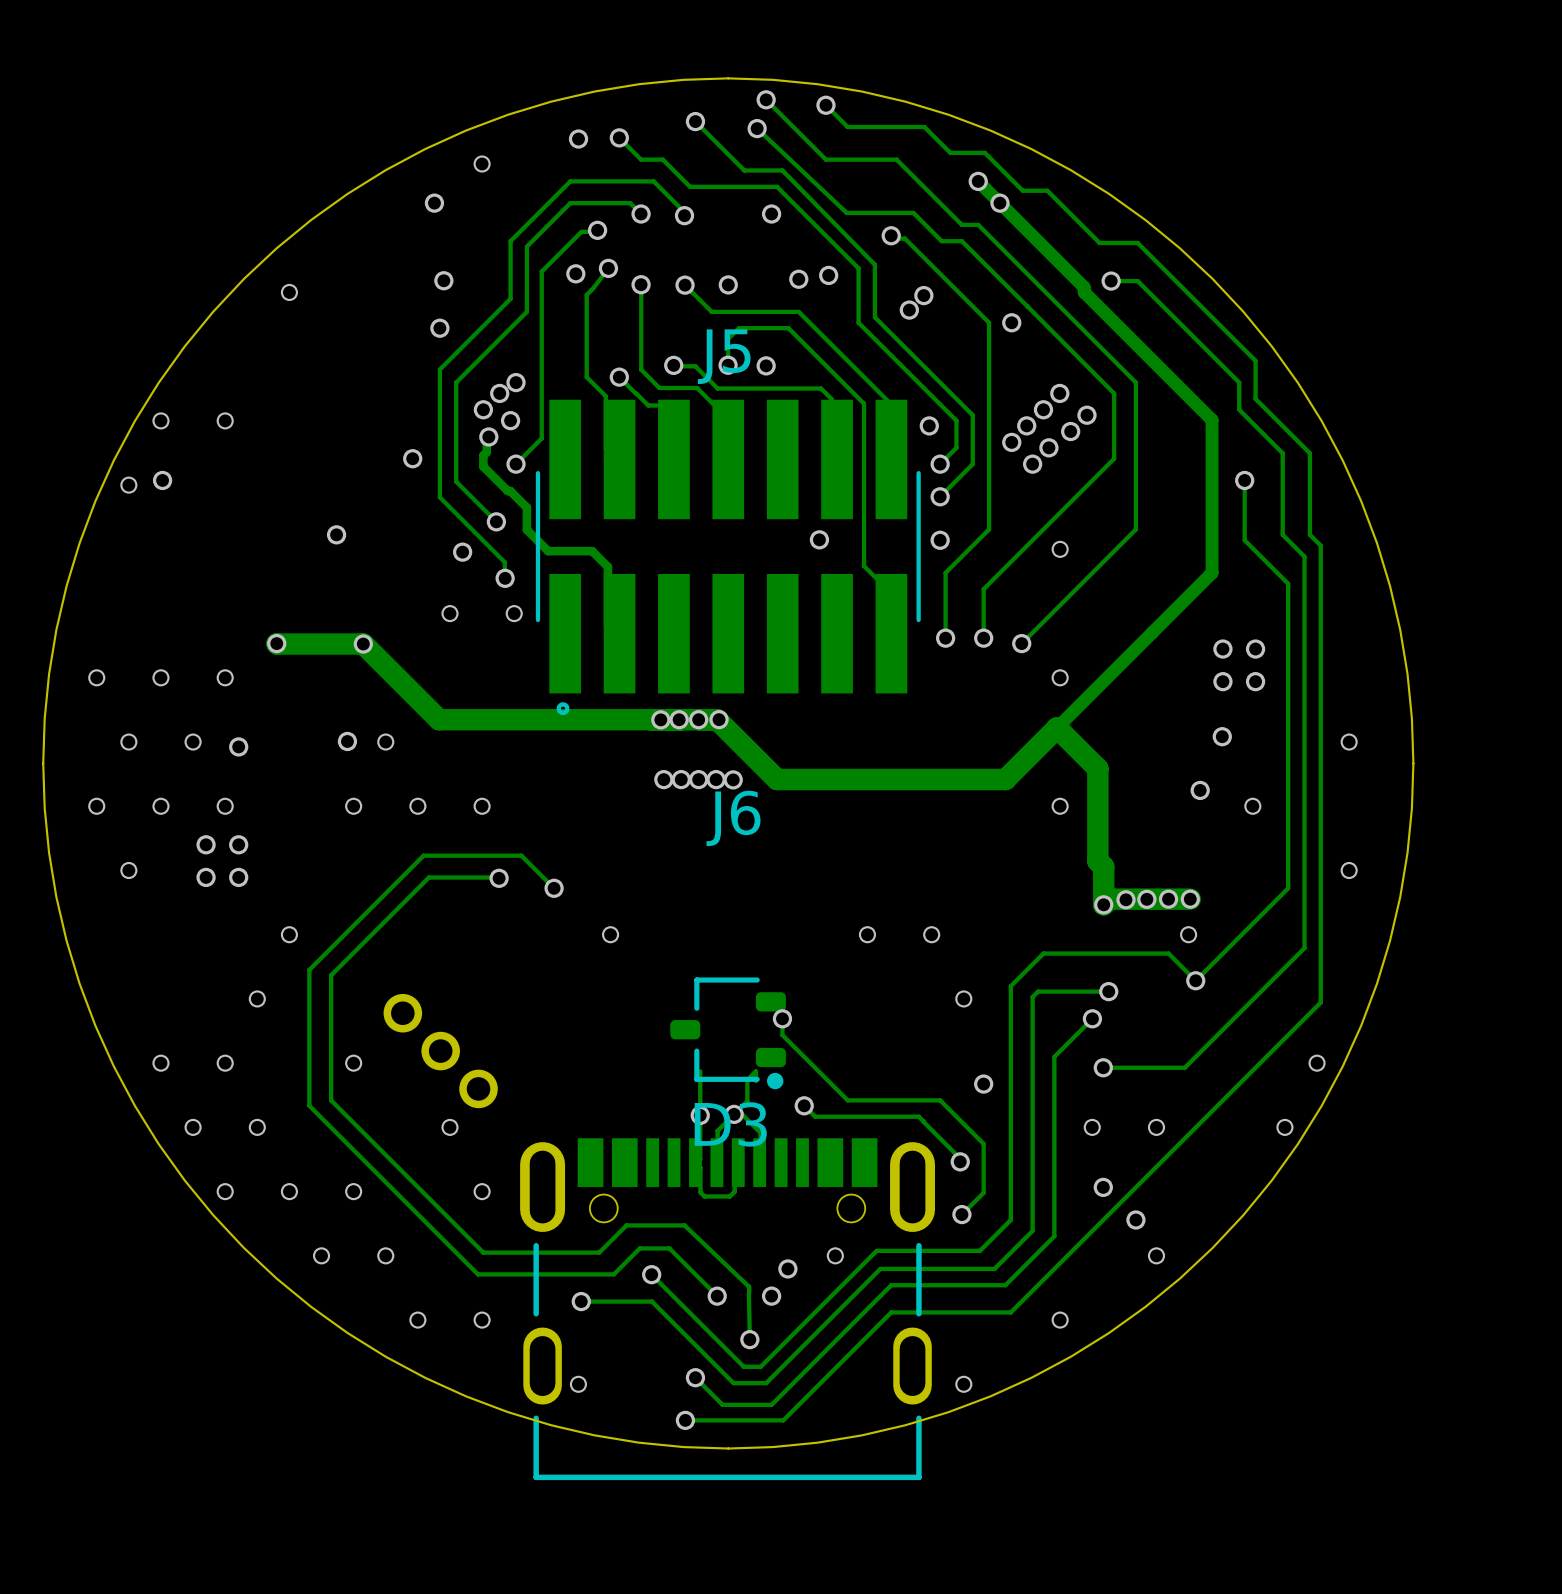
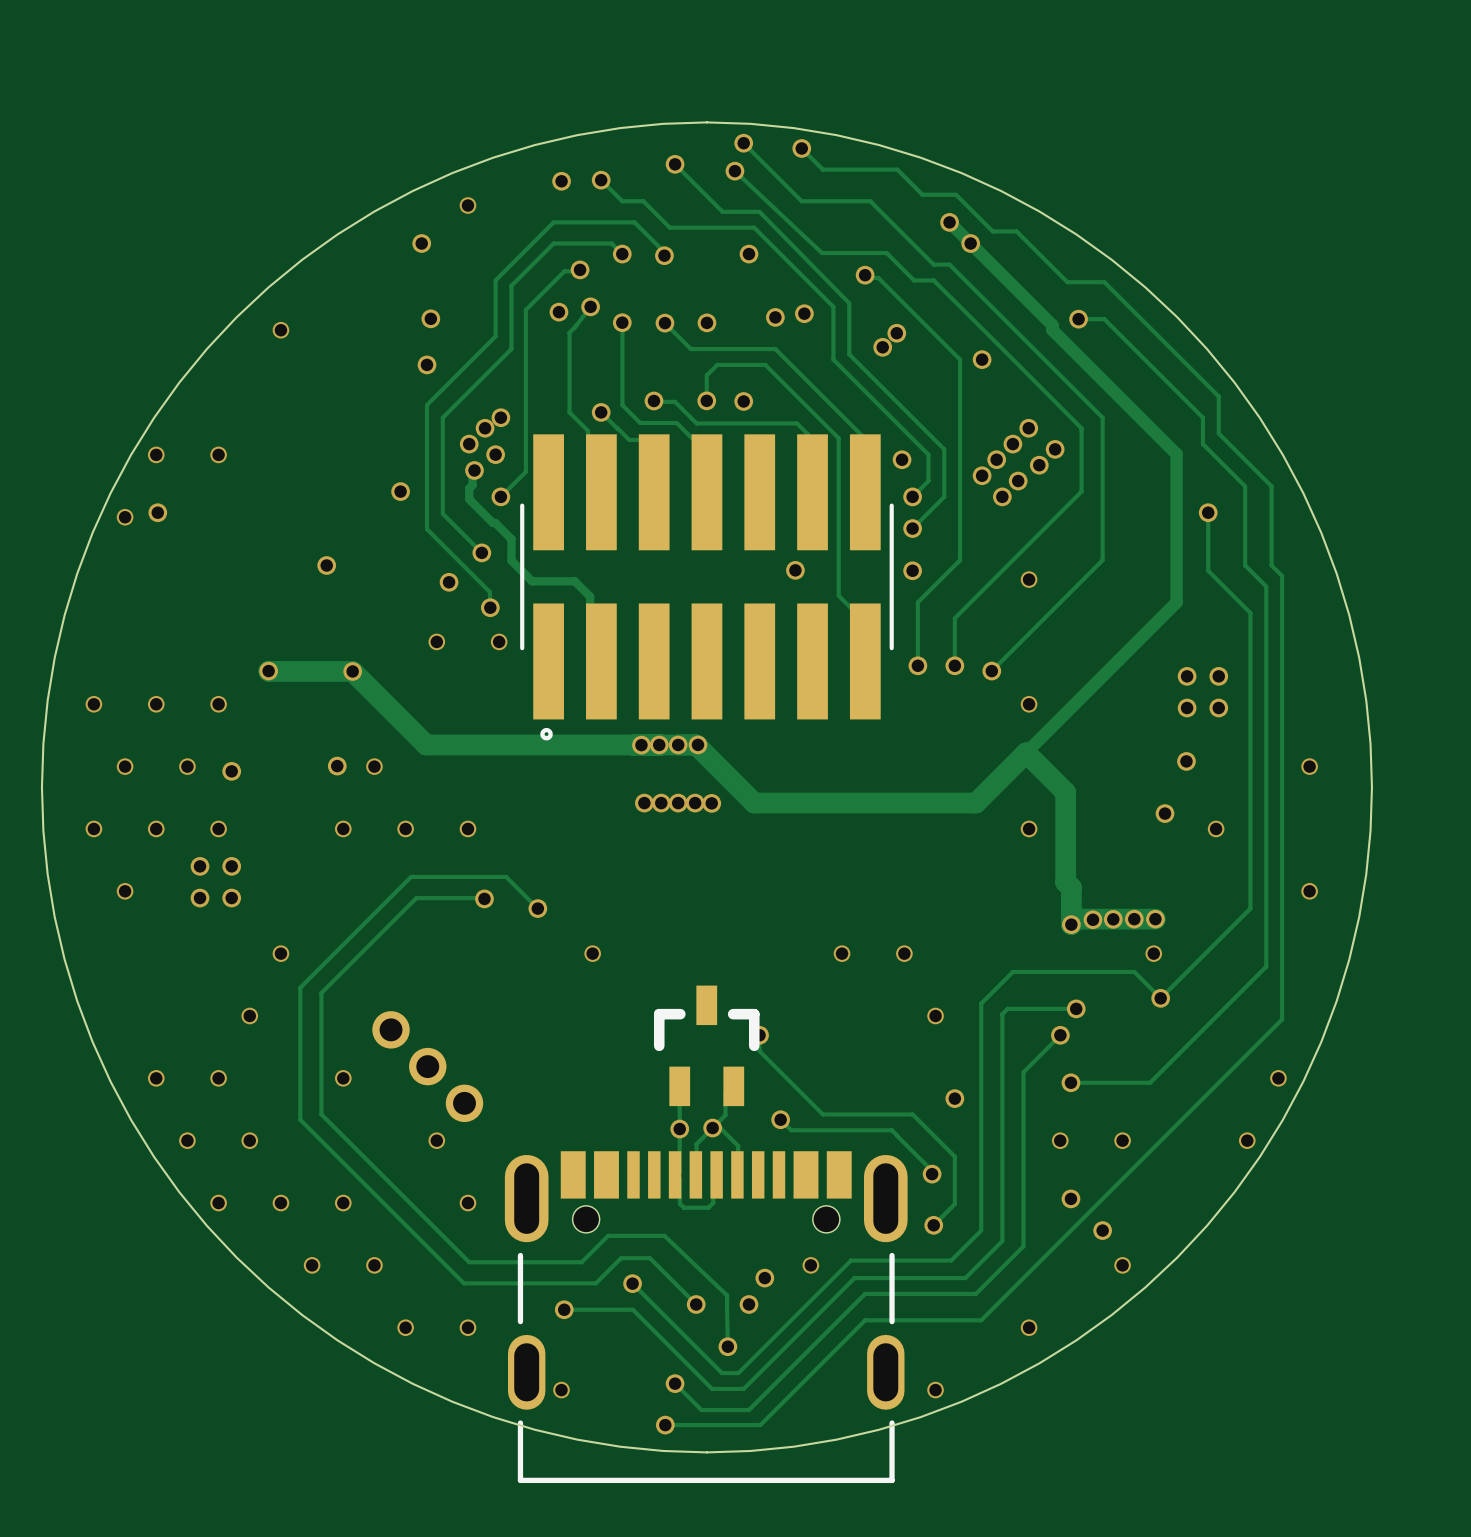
J5 name: J5 (724, 356) -> none
J6 name: J6 (733, 818) -> none
part: none -> (706, 1045)
D3: (728, 1033) -> none

